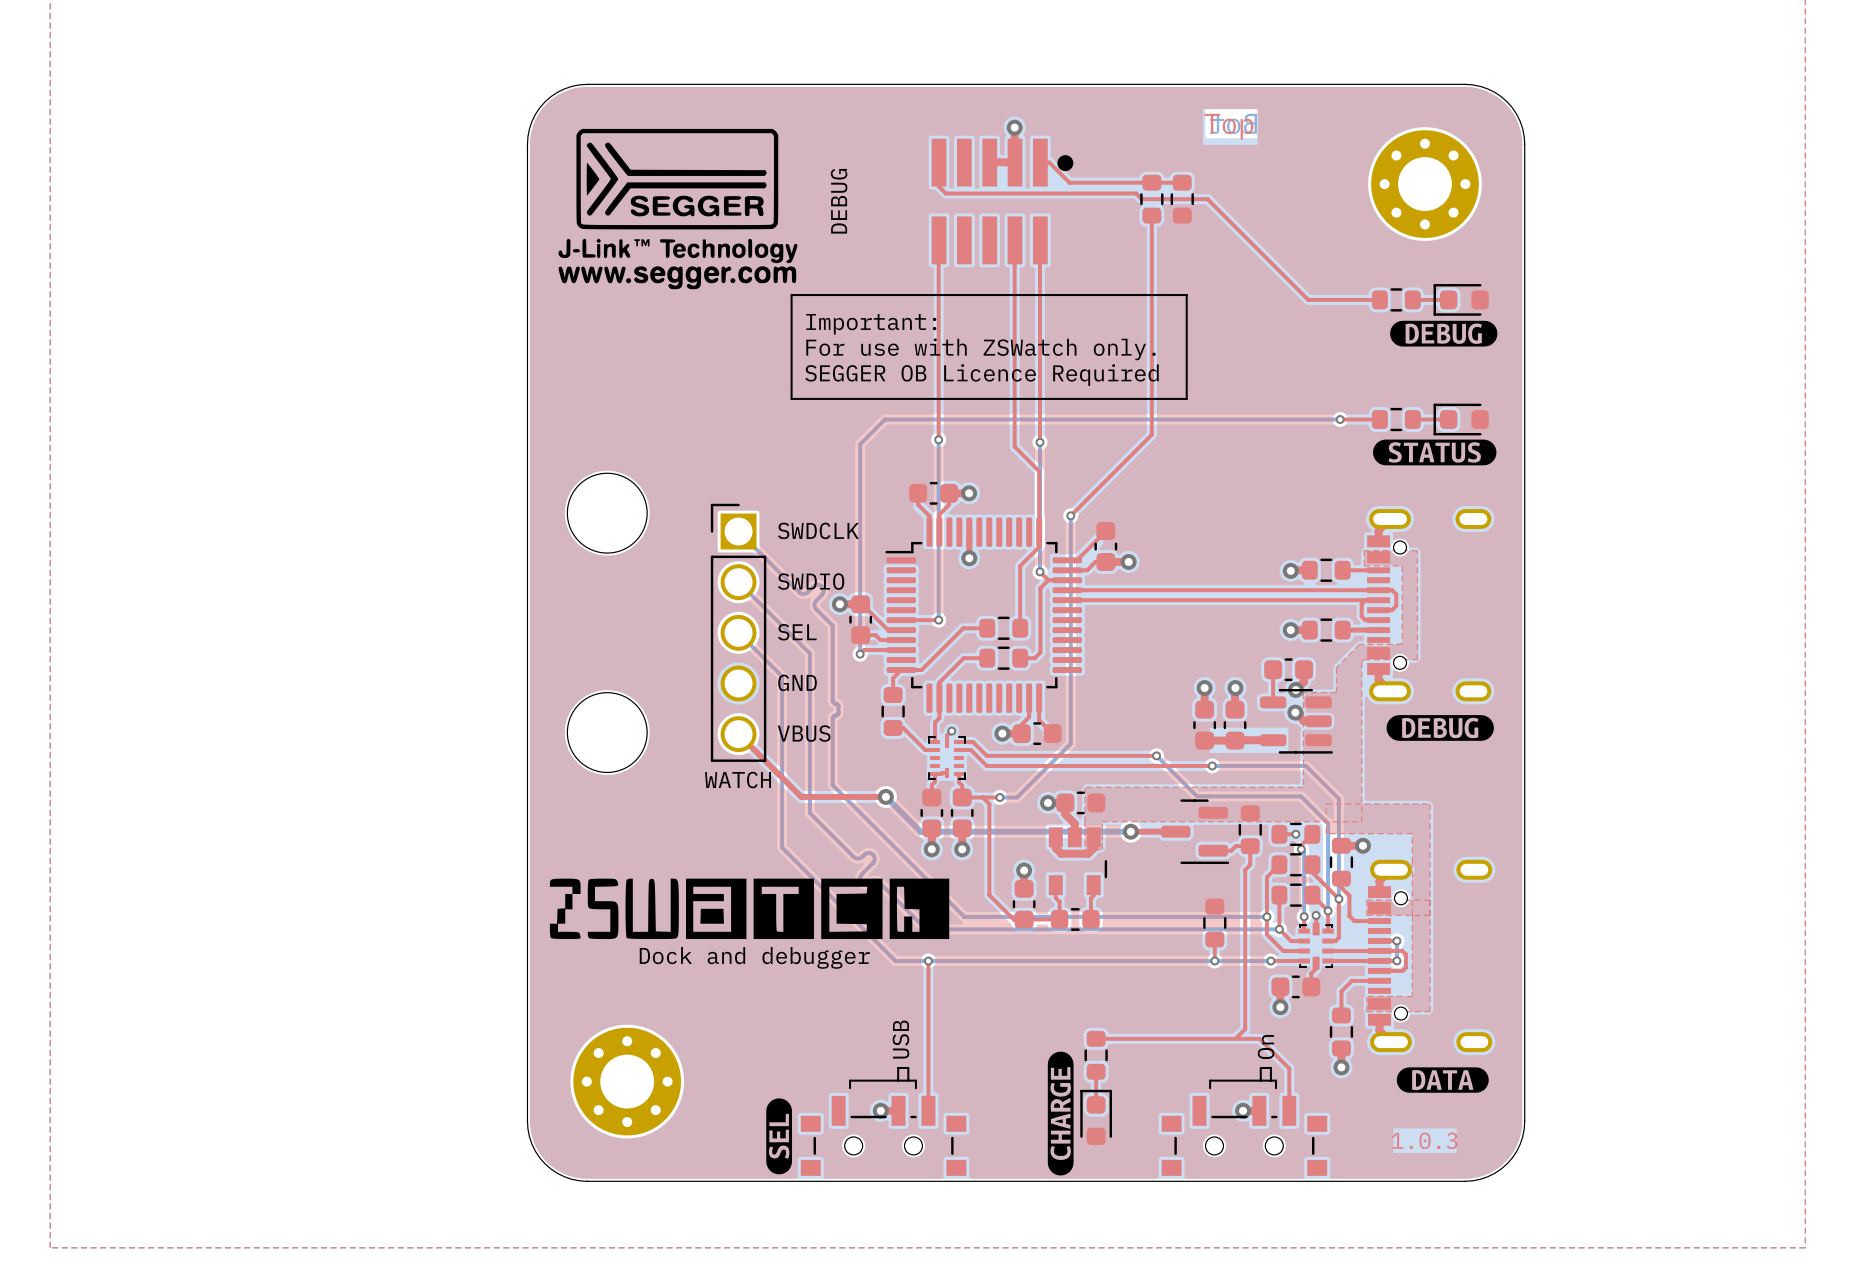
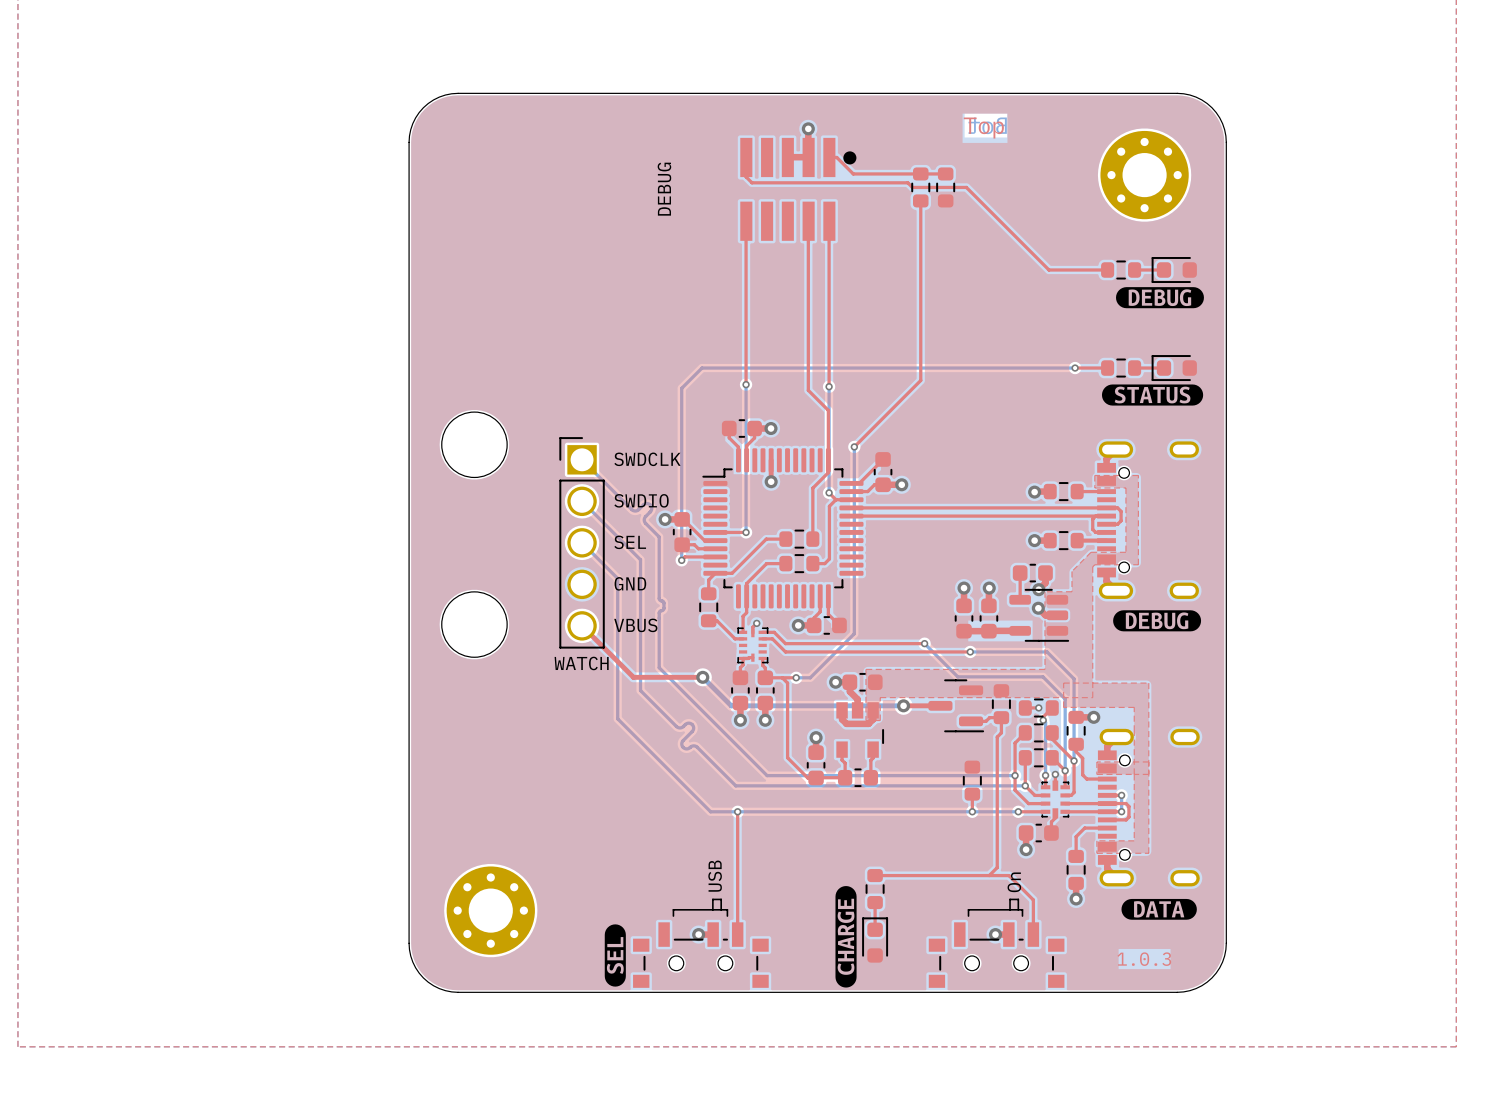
drawing: [558, 128, 798, 290] -> none
line: (791, 295) (1186, 295) (1186, 398) (791, 398) (791, 295) -> none
text: Important: (871, 324) -> none
text: For use with ZSWatch only. (981, 349) -> none
text: SEGGER OB Licence Required (981, 375) -> none
drawing: [549, 878, 950, 940] -> none
text: Dock and debugger (754, 957) -> none

